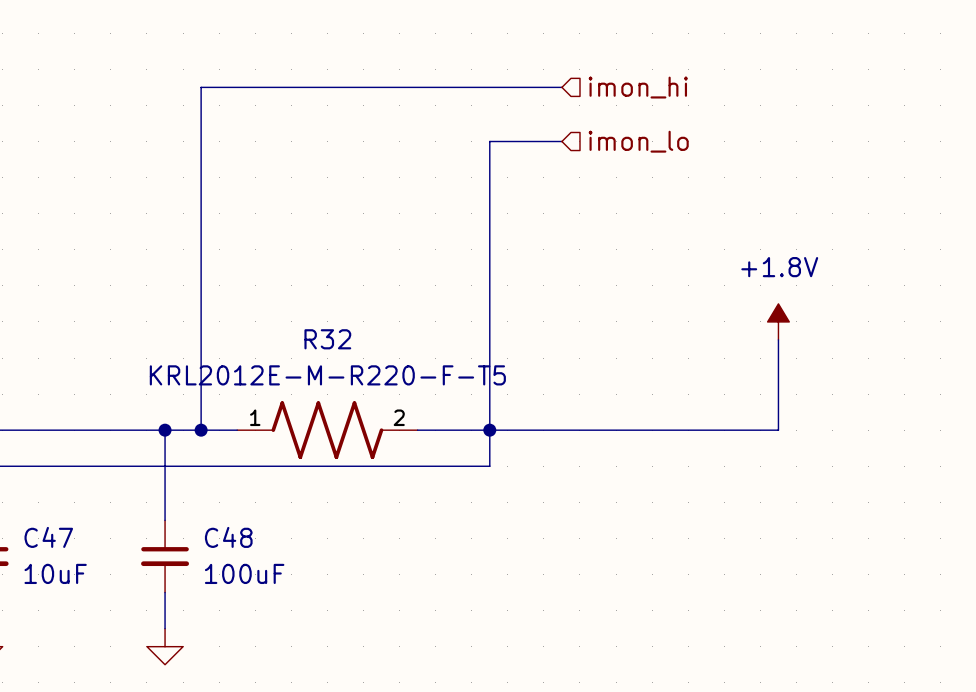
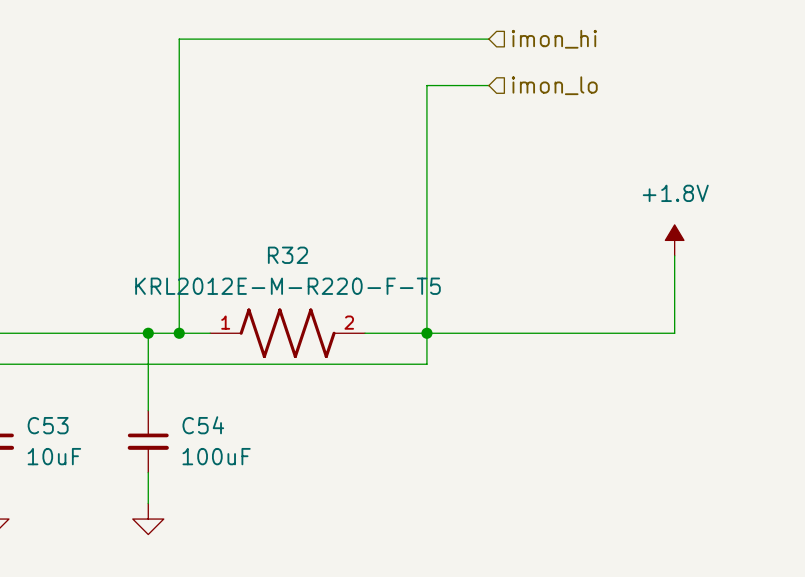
C47 name: C47 (48, 537) -> C53 (48, 425)
C48 name: C48 (228, 537) -> C54 (203, 425)

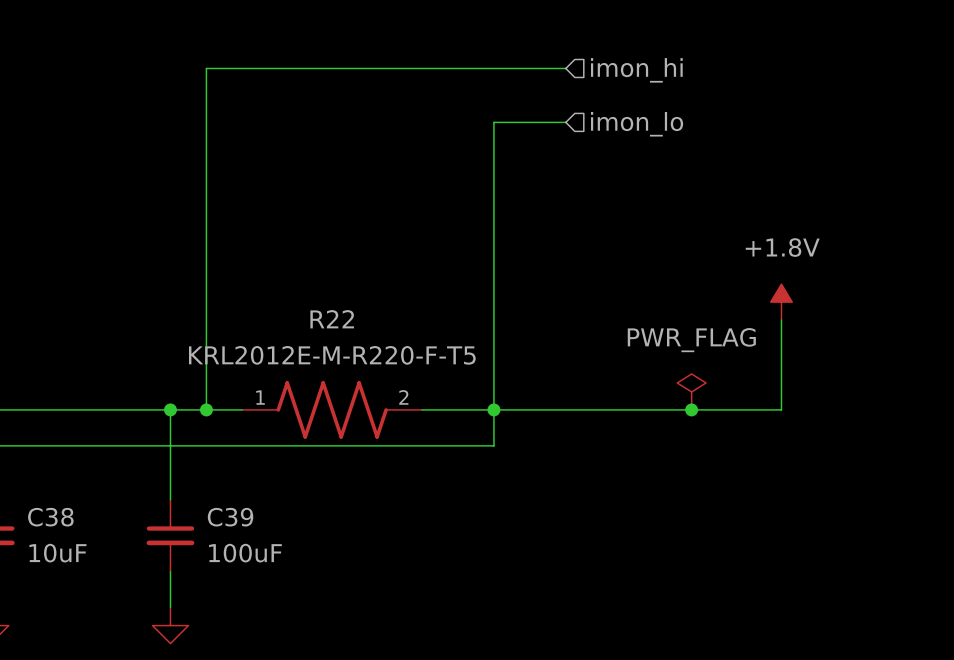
R32 name: R32 (287, 255) -> R22 (332, 319)
power symbol: none -> PWR_FLAG (691, 391)
junction: none -> (691, 409)
C53 name: C53 (48, 425) -> C38 (50, 517)
C54 name: C54 (203, 425) -> C39 (230, 517)

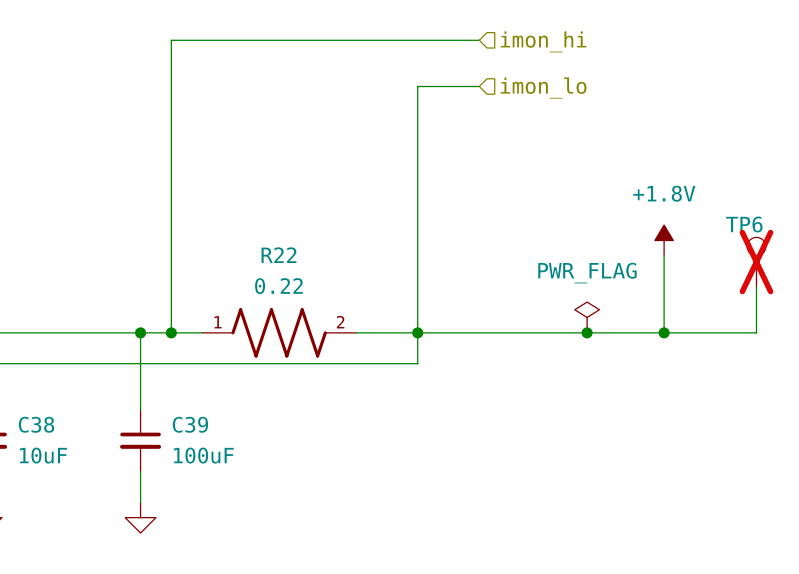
TP6: none -> (756, 262)
R22 value: KRL2012E-M-R220-F-T5 (332, 355) -> 0.22 (278, 286)
wire: none -> (756, 286) (756, 332) (664, 332)
junction: none -> (664, 332)

